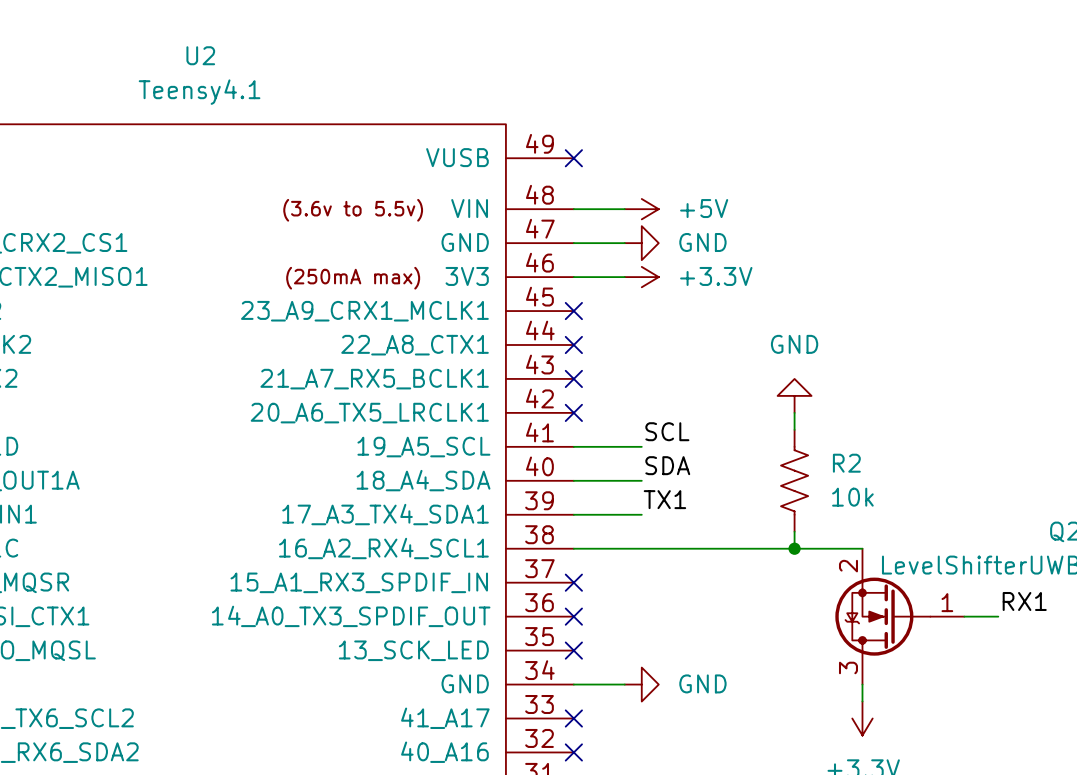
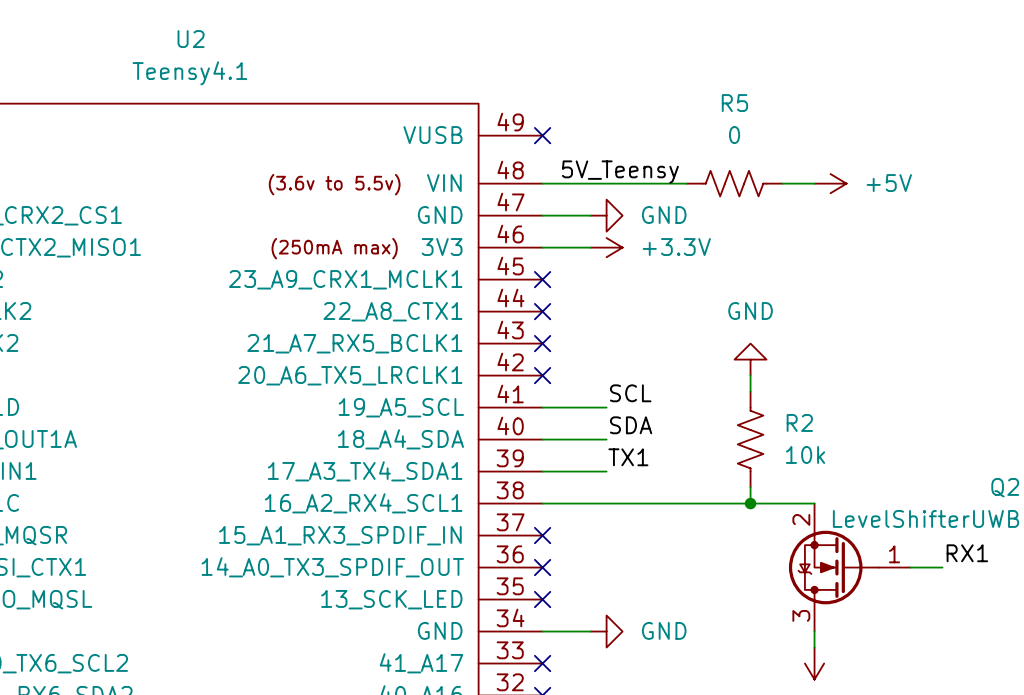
label: none -> 5V_Teensy (620, 172)
wire: none -> (590, 183) (686, 183)
power symbol position: +5V (641, 209) -> +5V (830, 183)
R5: none -> 0 (734, 183)
wire: none -> (782, 183) (814, 183)

